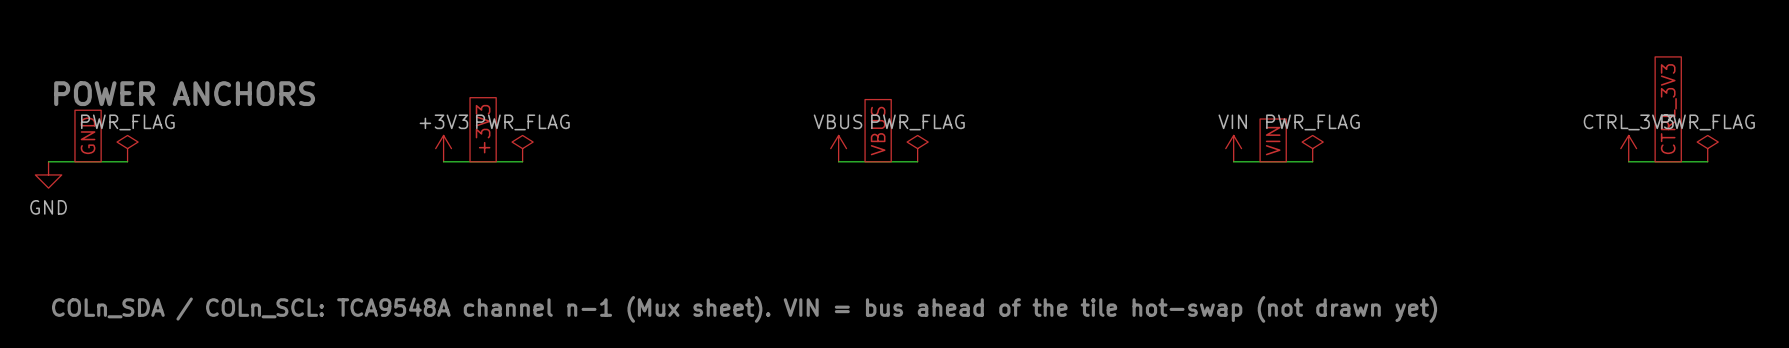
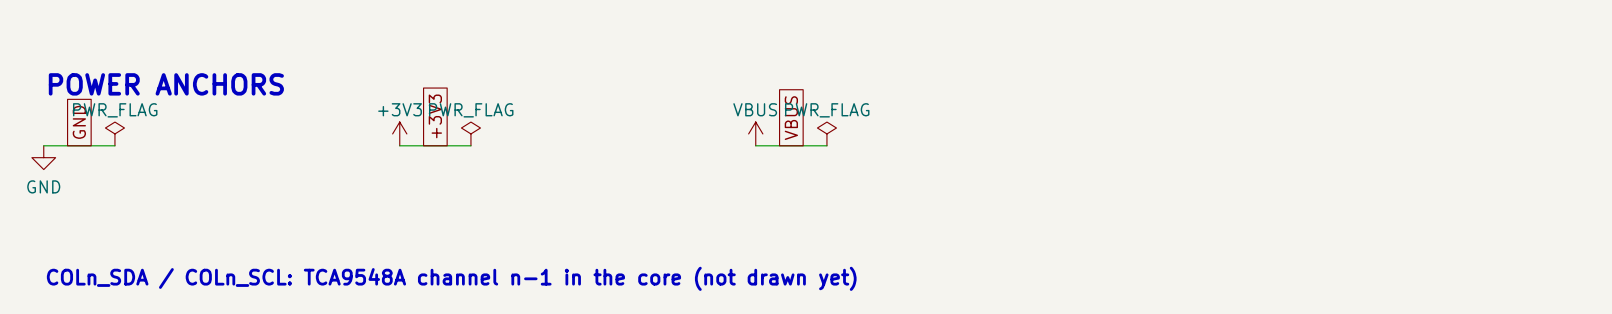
global label: CTRL_3V3 (1668, 109) -> none
global label: VIN (1273, 141) -> none
power symbol: VIN (1233, 148) -> none
power symbol: PWR_FLAG (1312, 148) -> none
power symbol: CTRL_3V3 (1628, 148) -> none
power symbol: PWR_FLAG (1707, 148) -> none
wire: (1233, 161) (1312, 161) -> none
wire: (1628, 161) (1707, 161) -> none
text: COLn_SDA / COLn_SCL: TCA9548A channel n-1 (Mux sheet). VIN = bus ahead of the tile hot-swap (not drawn yet) (744, 309) -> COLn_SDA / COLn_SCL: TCA9548A channel n-1 in the core (not drawn yet) (451, 278)

